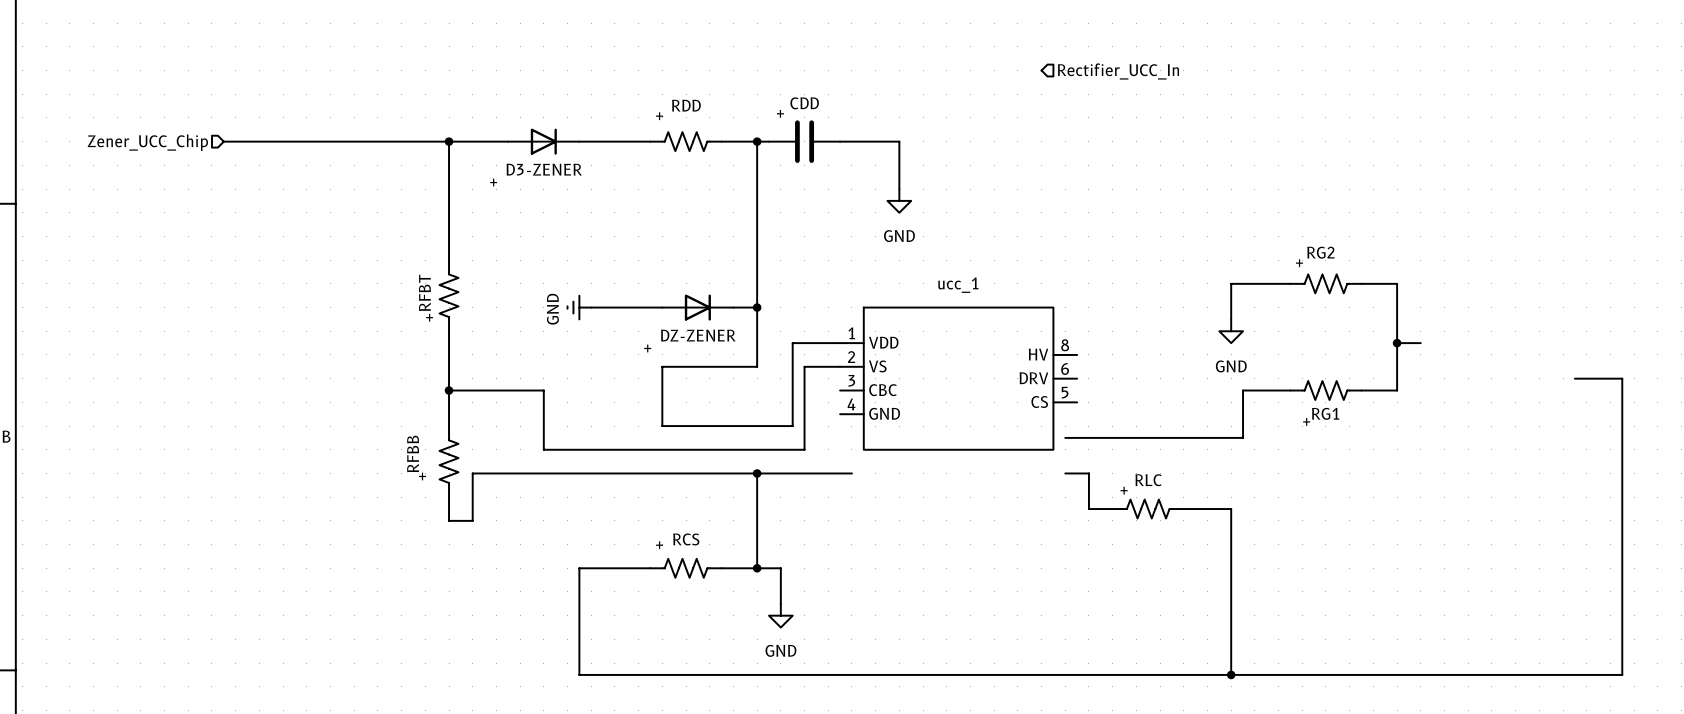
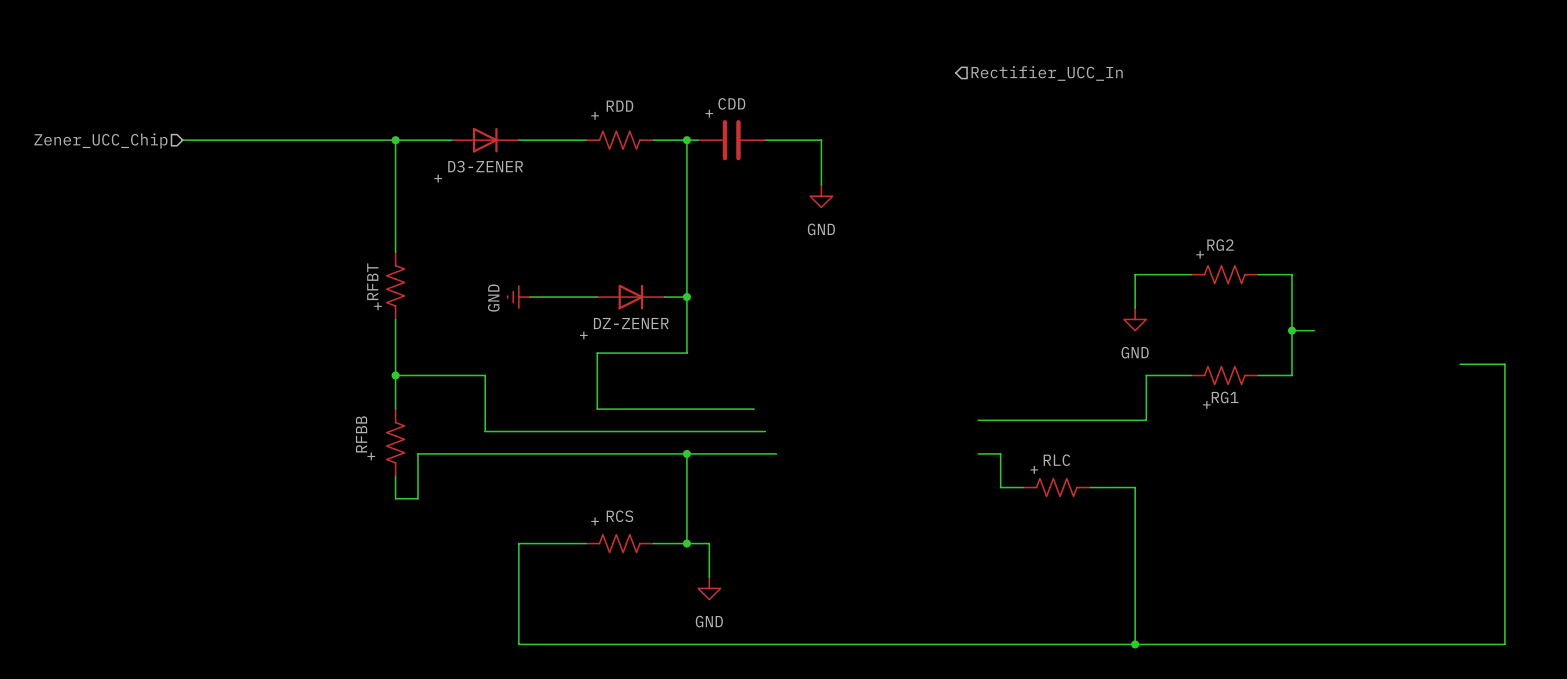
wire: (840, 343) (792, 343) (792, 426) -> (754, 409) (720, 409)
wire: (840, 366) (804, 366) (804, 449) -> (765, 431) (731, 431)
ucc_1: (958, 378) -> none

